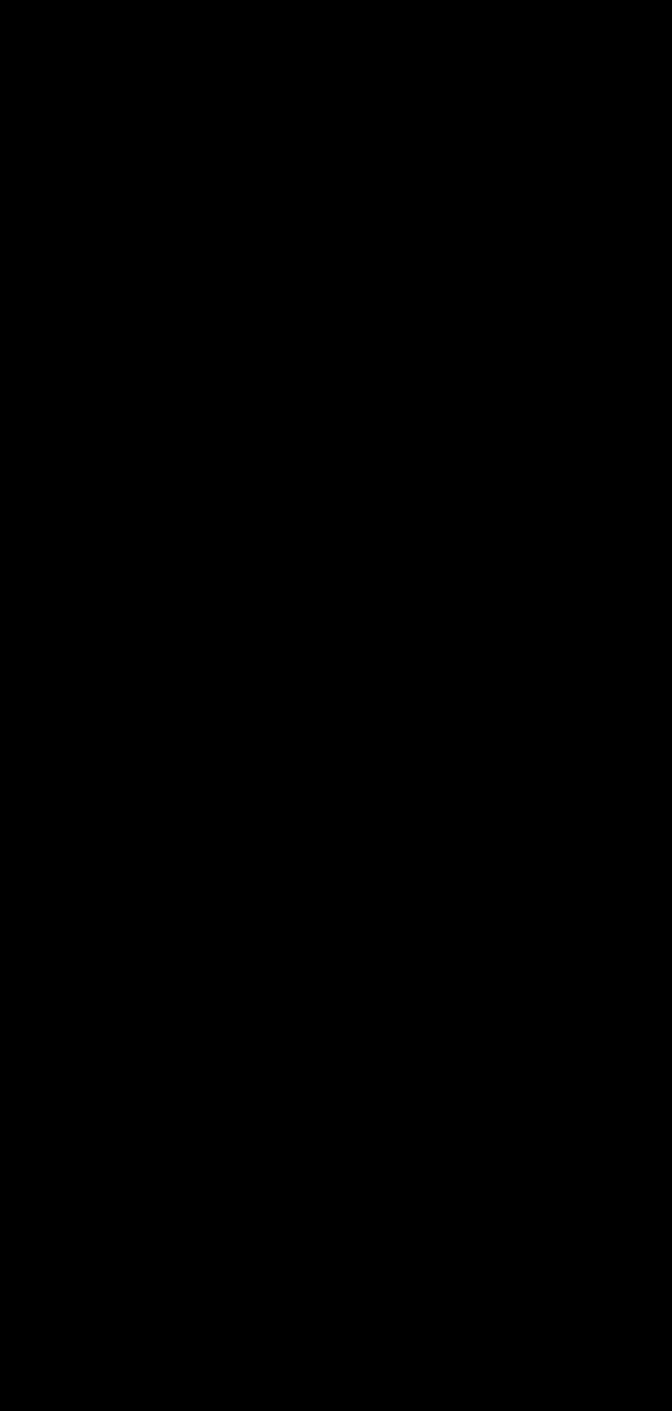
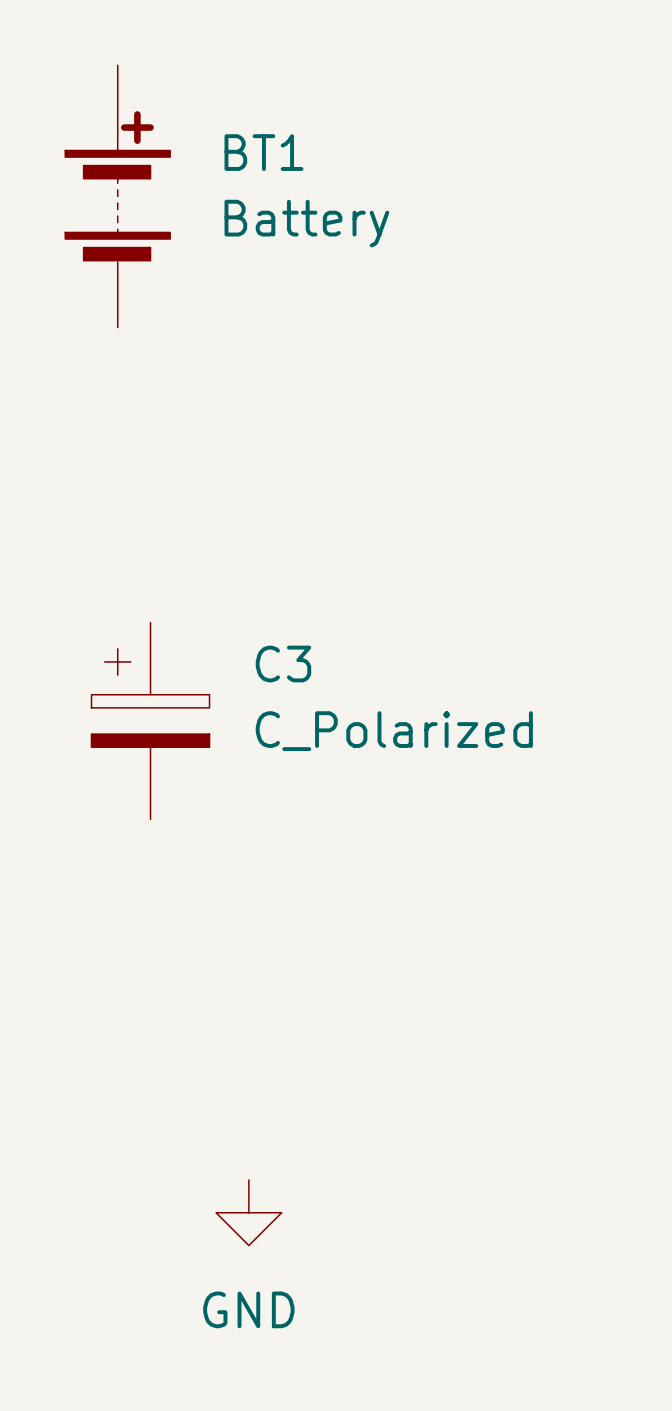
BT1: none -> Battery (117, 196)
C3: none -> C_Polarized (150, 720)
power symbol: none -> GND (248, 1212)

